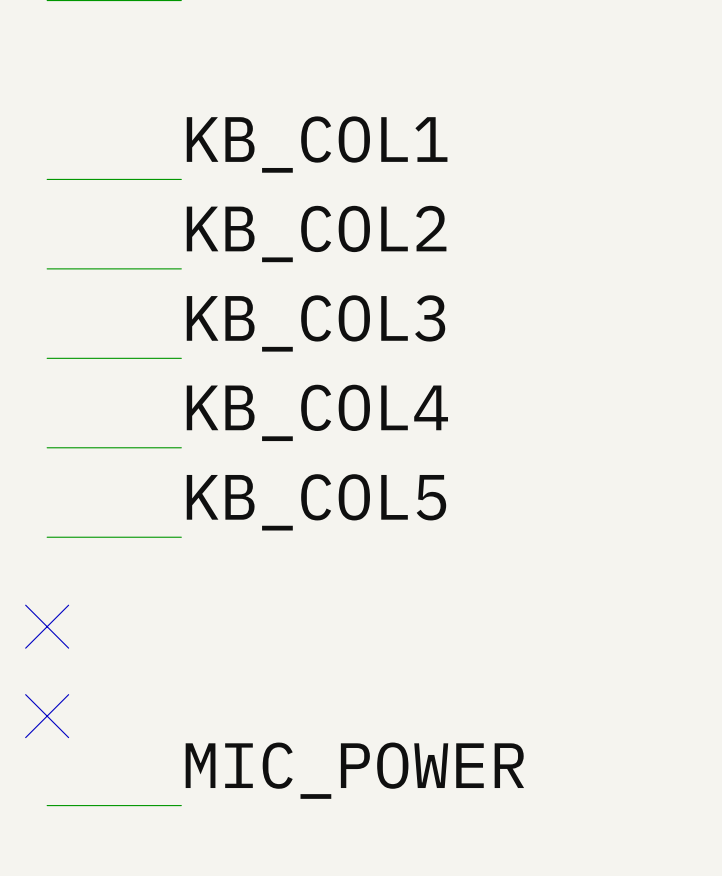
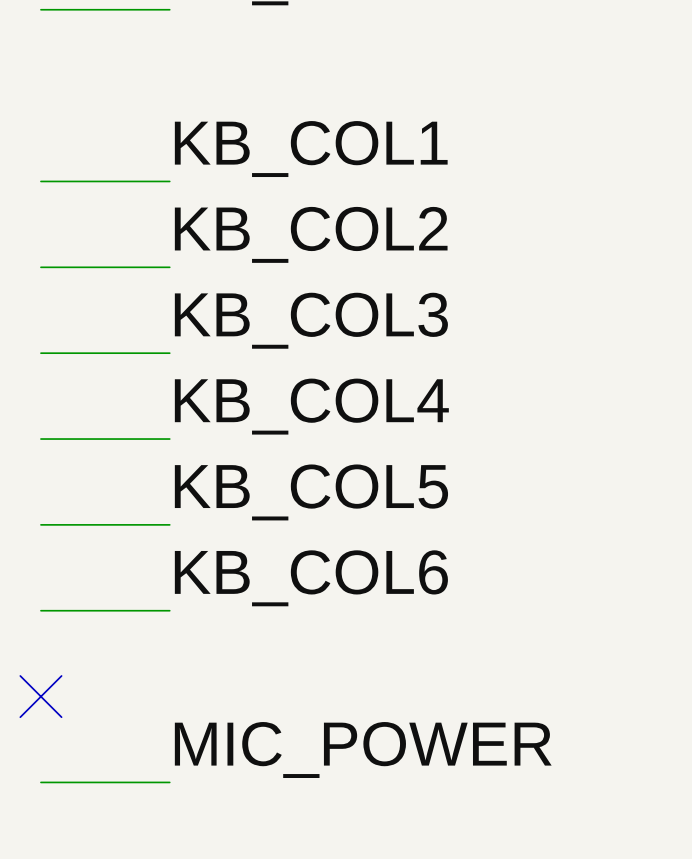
label: none -> KB_COL6 (311, 578)
wire: none -> (40, 610) (169, 610)
no-connect mark: (47, 626) -> none

